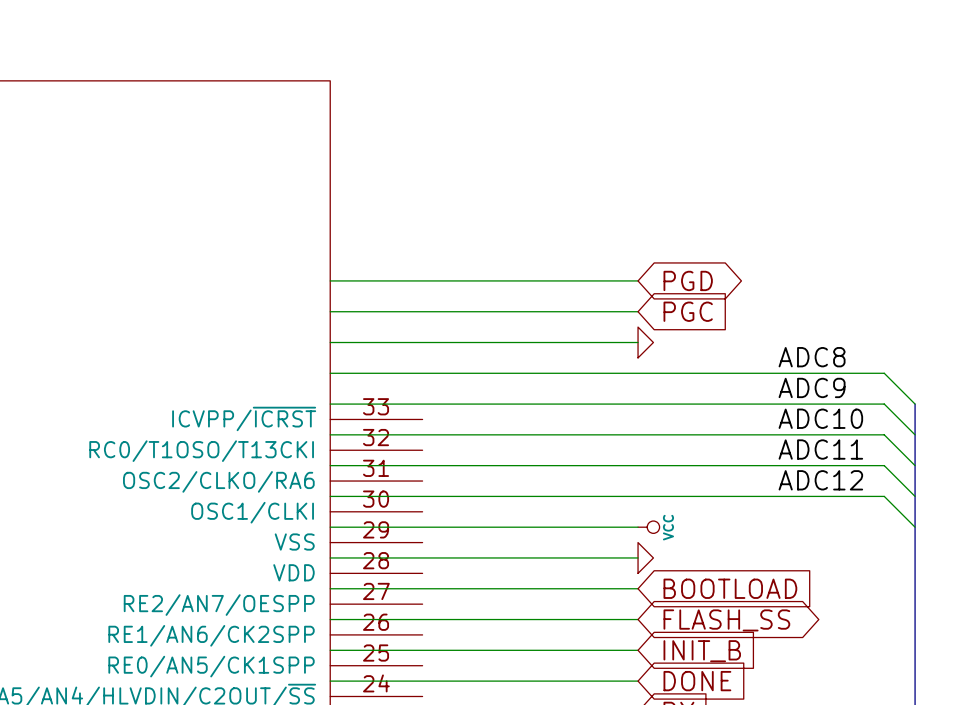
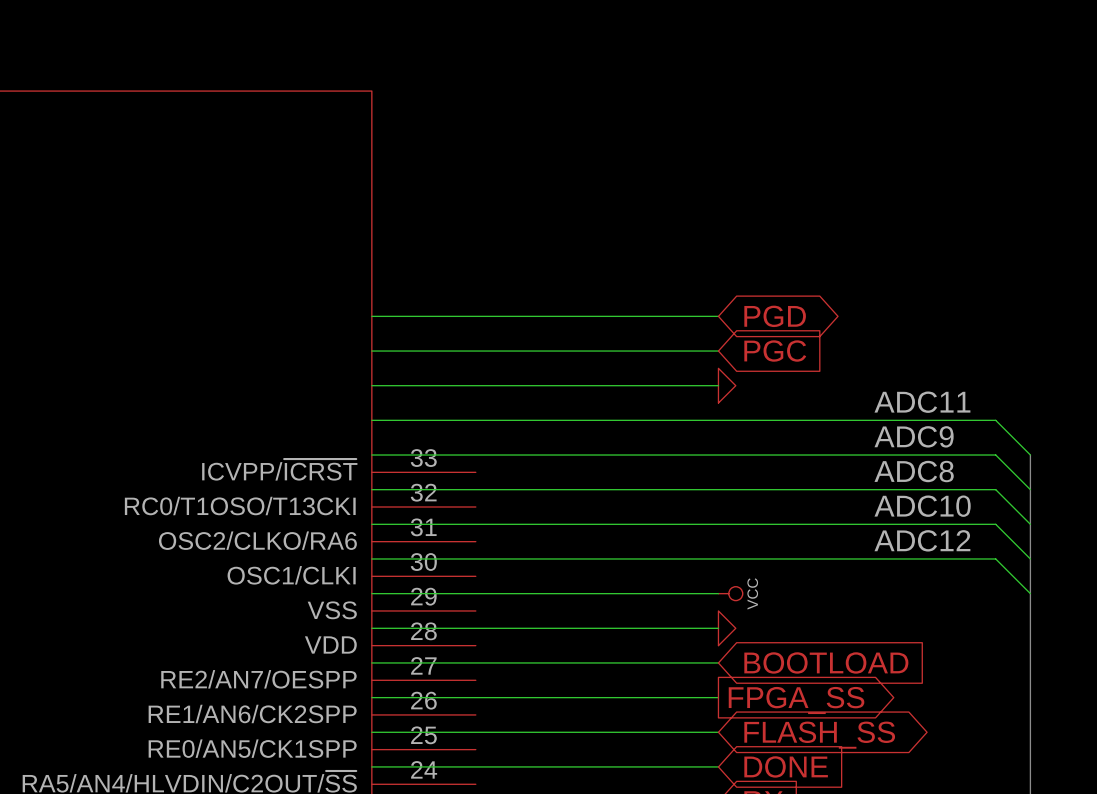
label: ADC8 (812, 357) -> ADC11 (922, 402)
label: ADC10 (820, 418) -> ADC8 (914, 471)
label: ADC11 (820, 449) -> ADC10 (922, 506)
global label shape: bidirectional (726, 620) -> output (796, 700)
global label: FLASH_SS (726, 620) -> FPGA_SS (796, 700)
global label shape: input (702, 651) -> bidirectional (819, 735)
global label: INIT_B (702, 651) -> FLASH_SS (819, 735)

